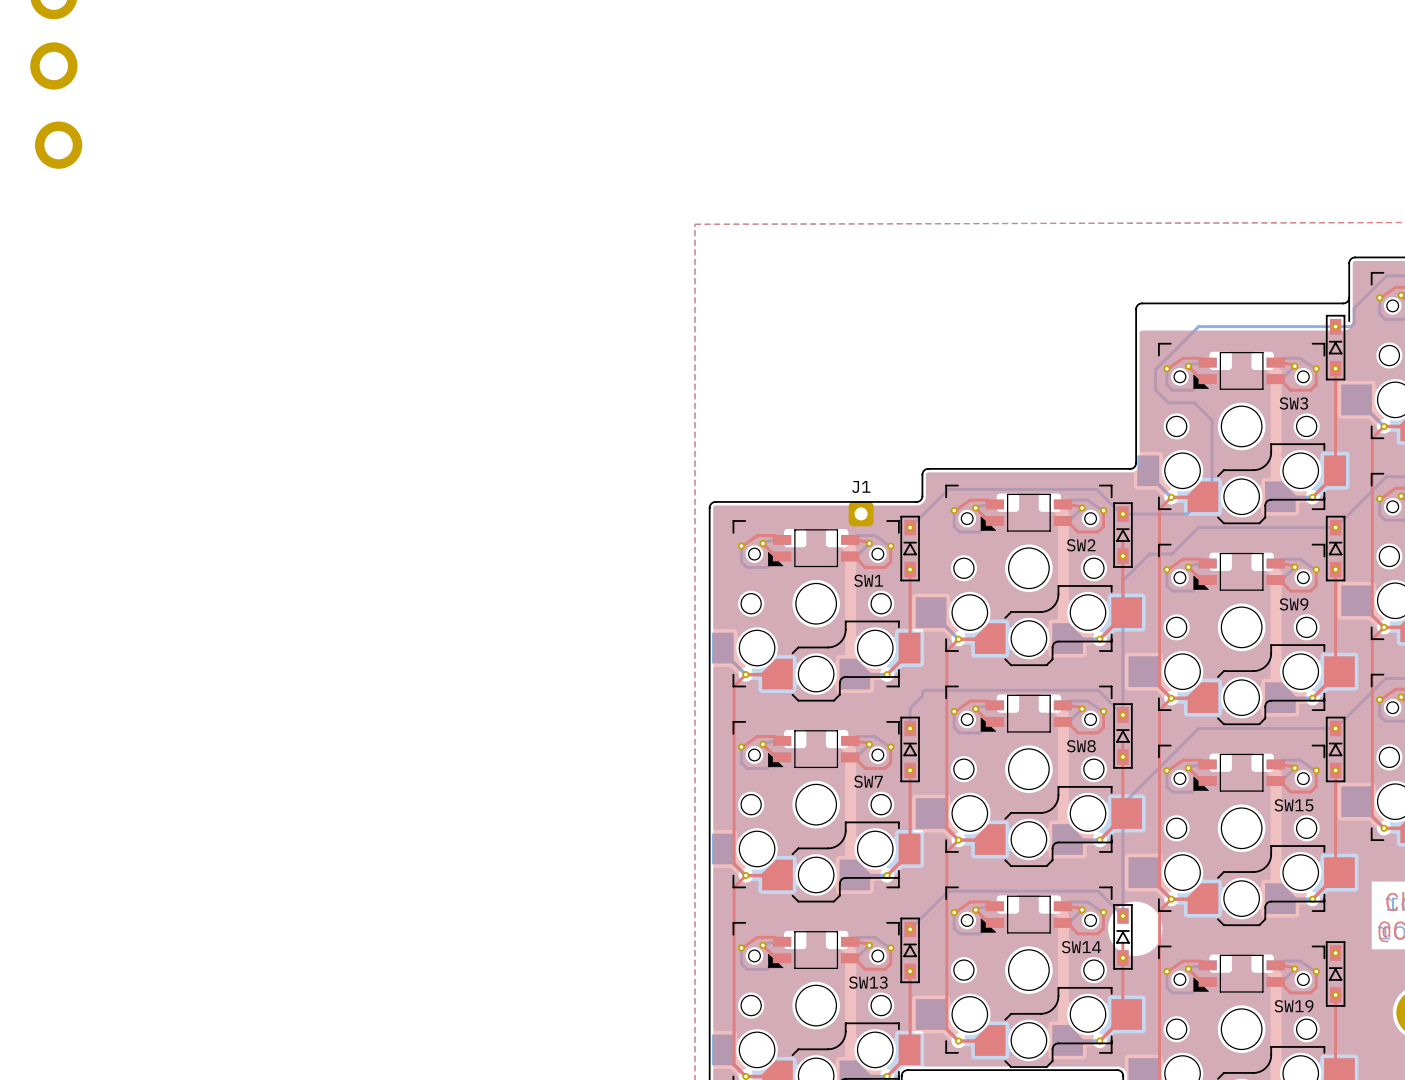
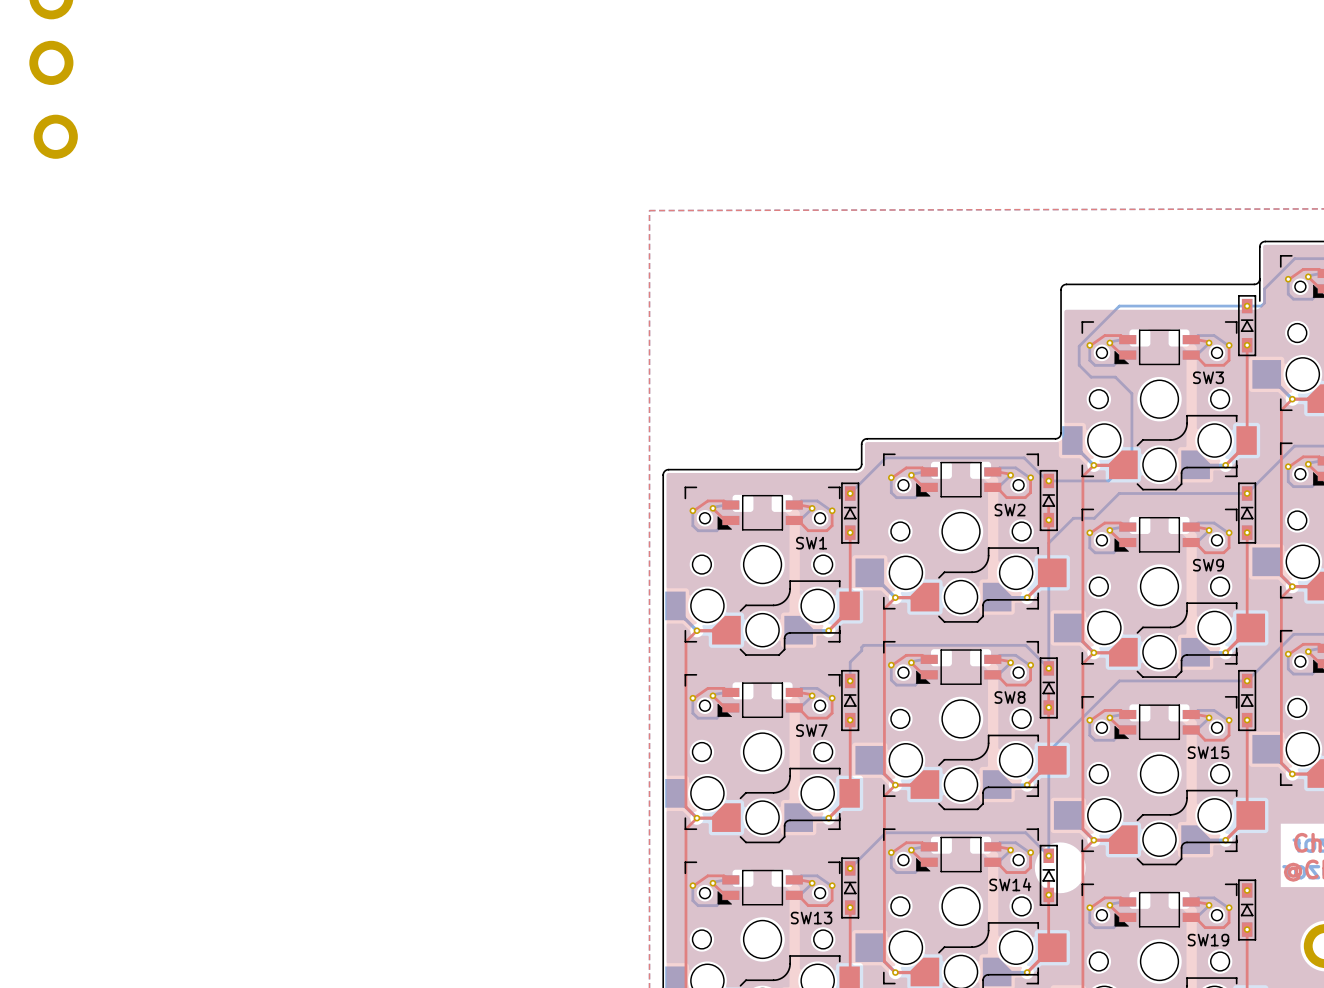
J1: (861, 513) -> none

